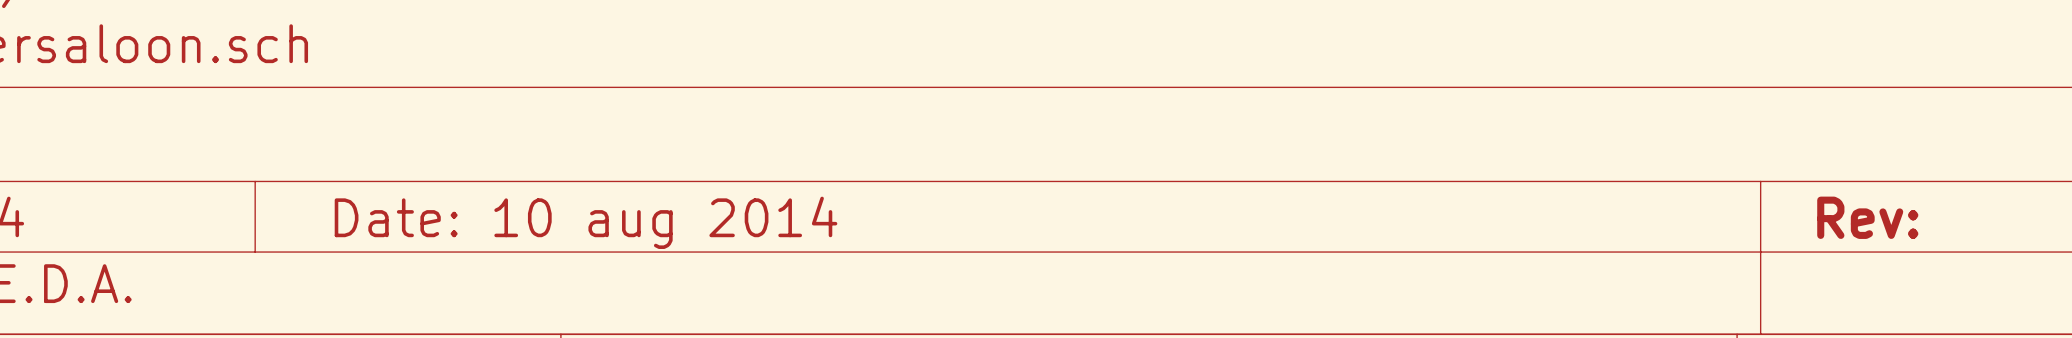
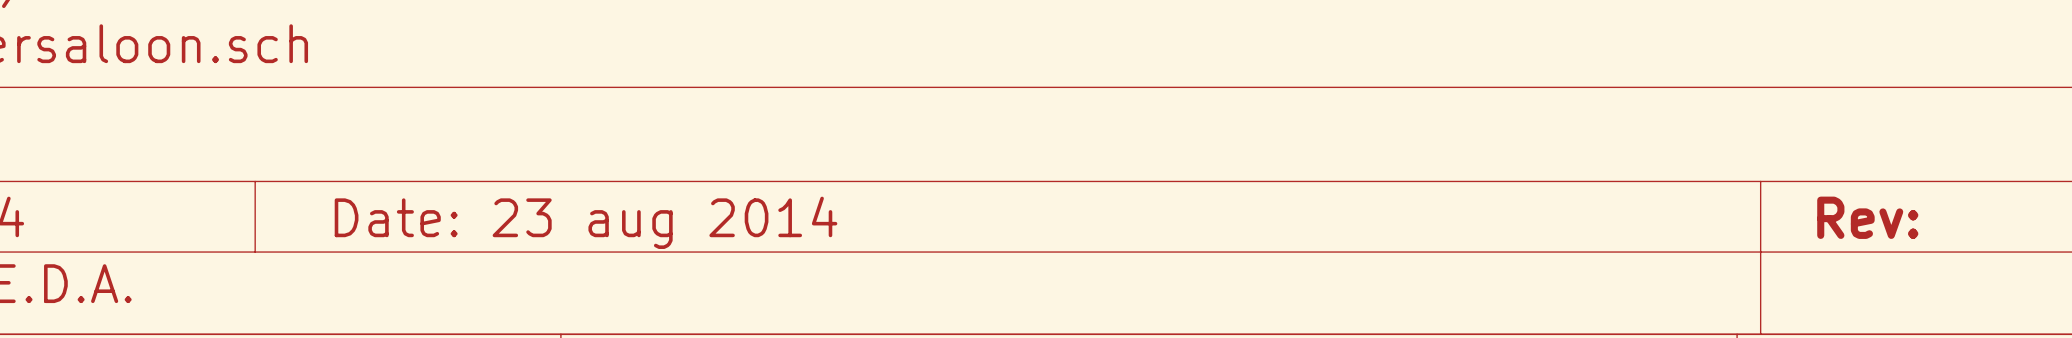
title block: Date: 10 aug 2014 (586, 222) -> Date: 23 aug 2014 (586, 222)

